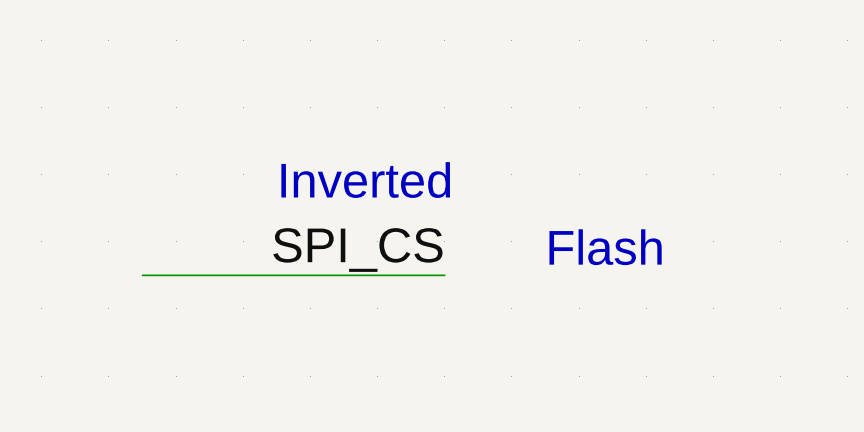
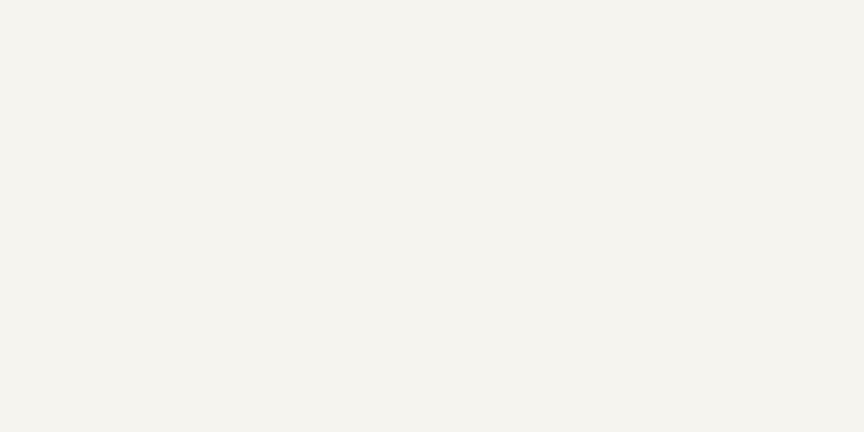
text: Inverted (365, 180) -> none
text: Flash (605, 247) -> none
label: SPI_CS (357, 250) -> none
wire: (142, 275) (444, 275) -> none

